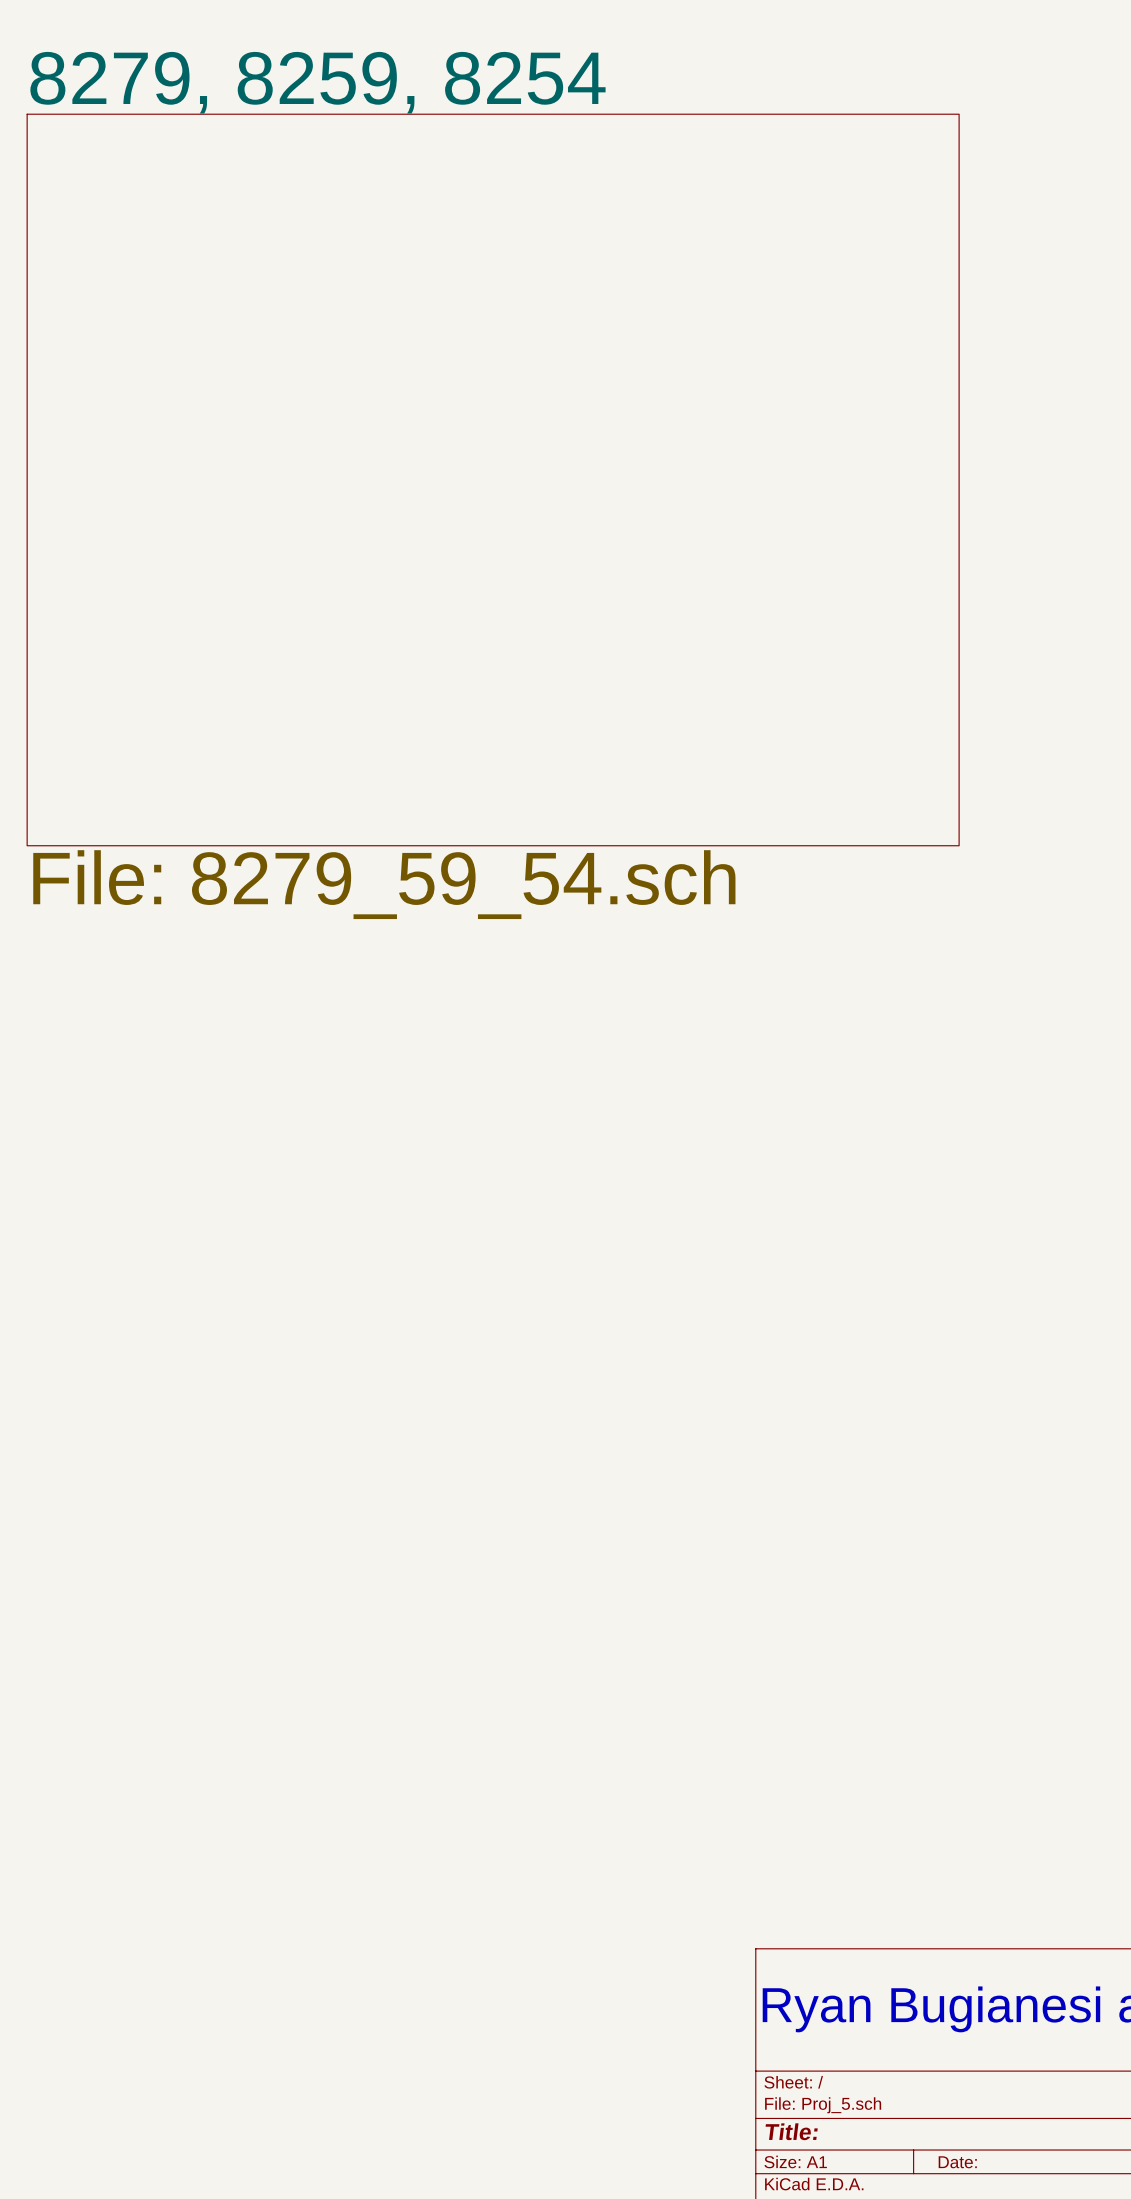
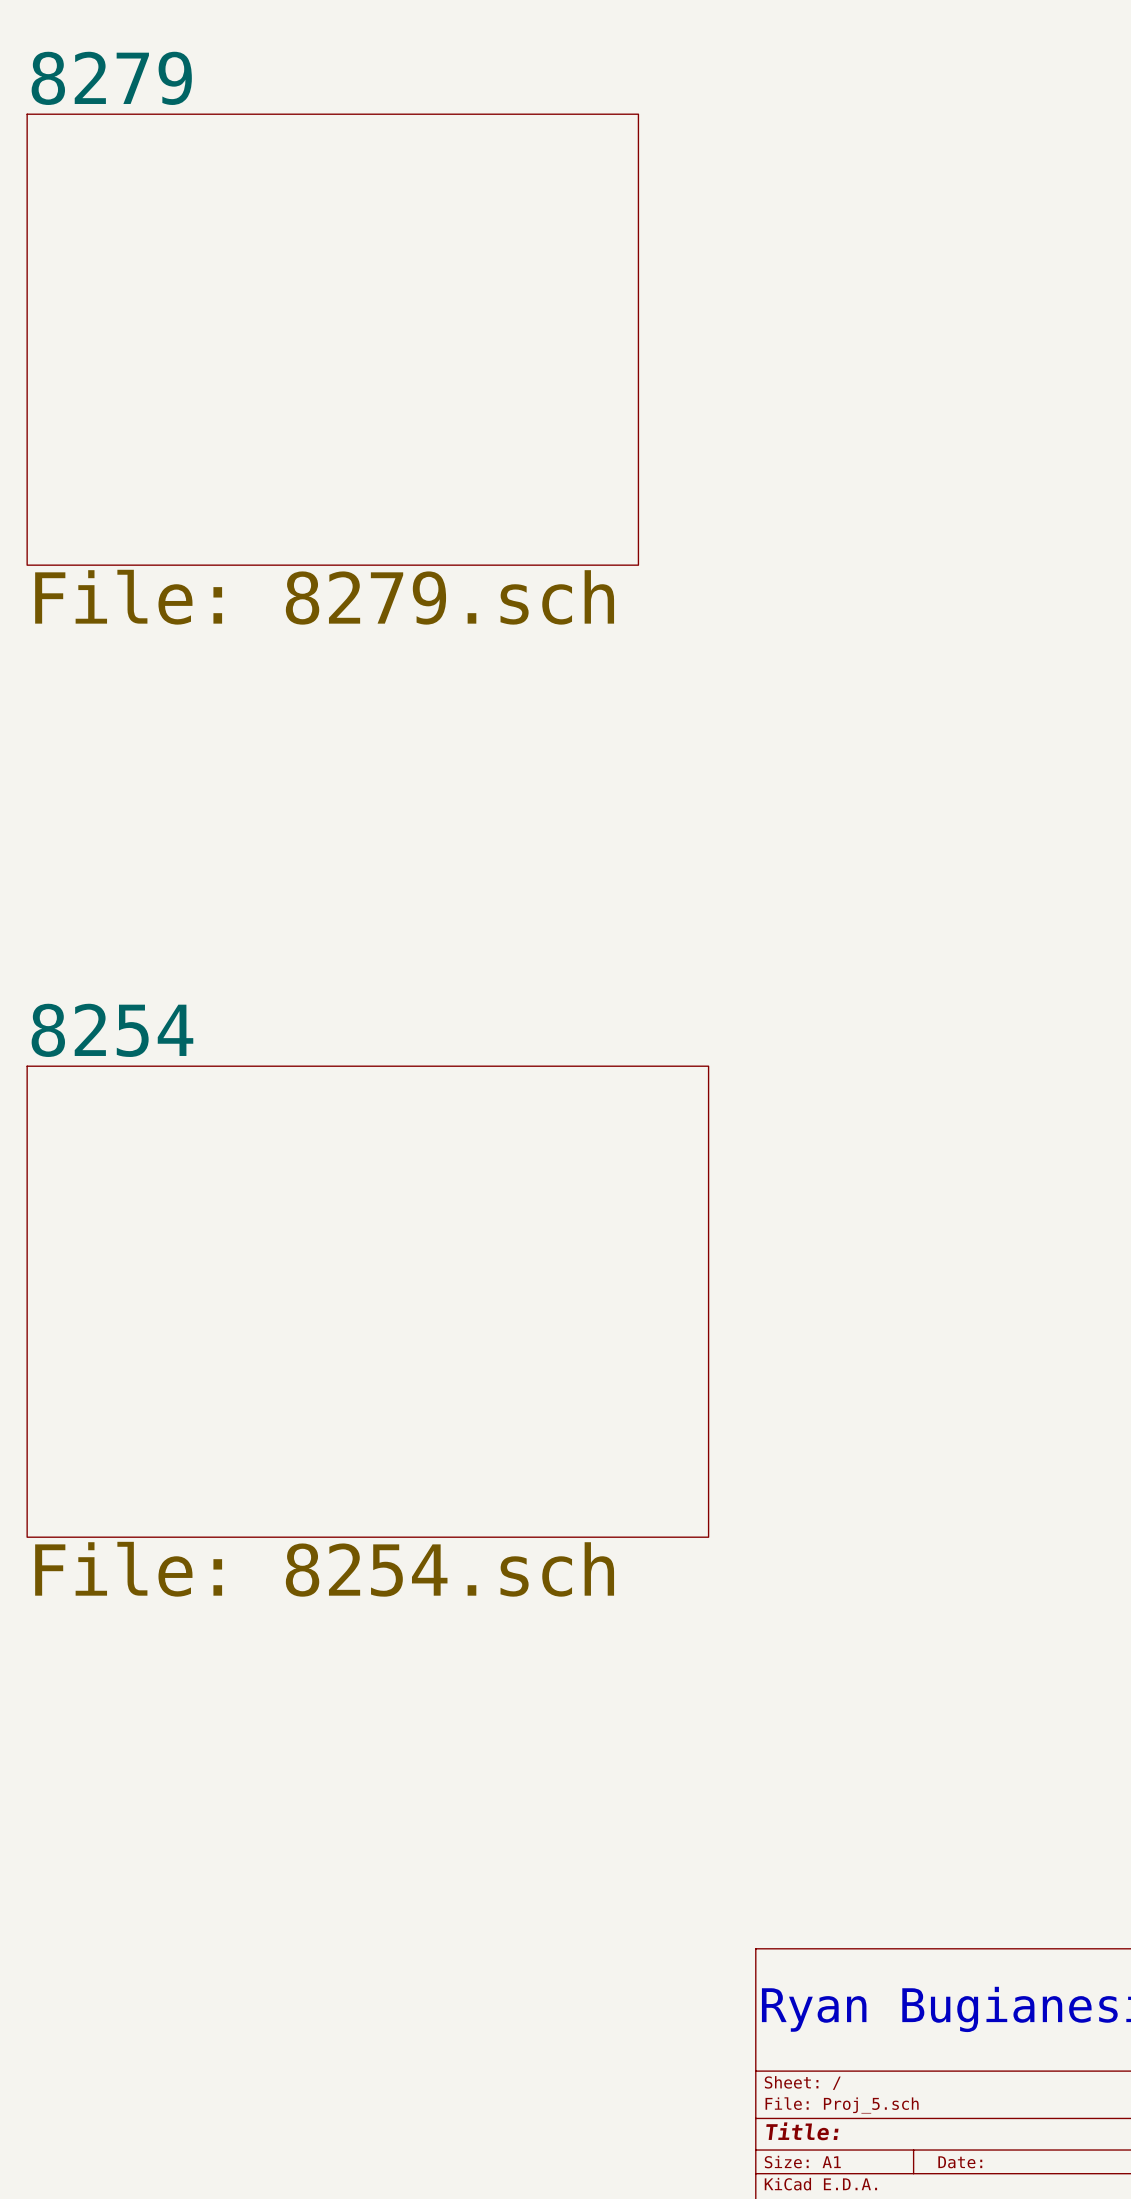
sheet 8279: none -> File: 8279.sch (332, 339)
sheet 8279, 8259, 8254: File: 8279_59_54.sch (493, 479) -> none
sheet 8254: none -> File: 8254.sch (367, 1301)

